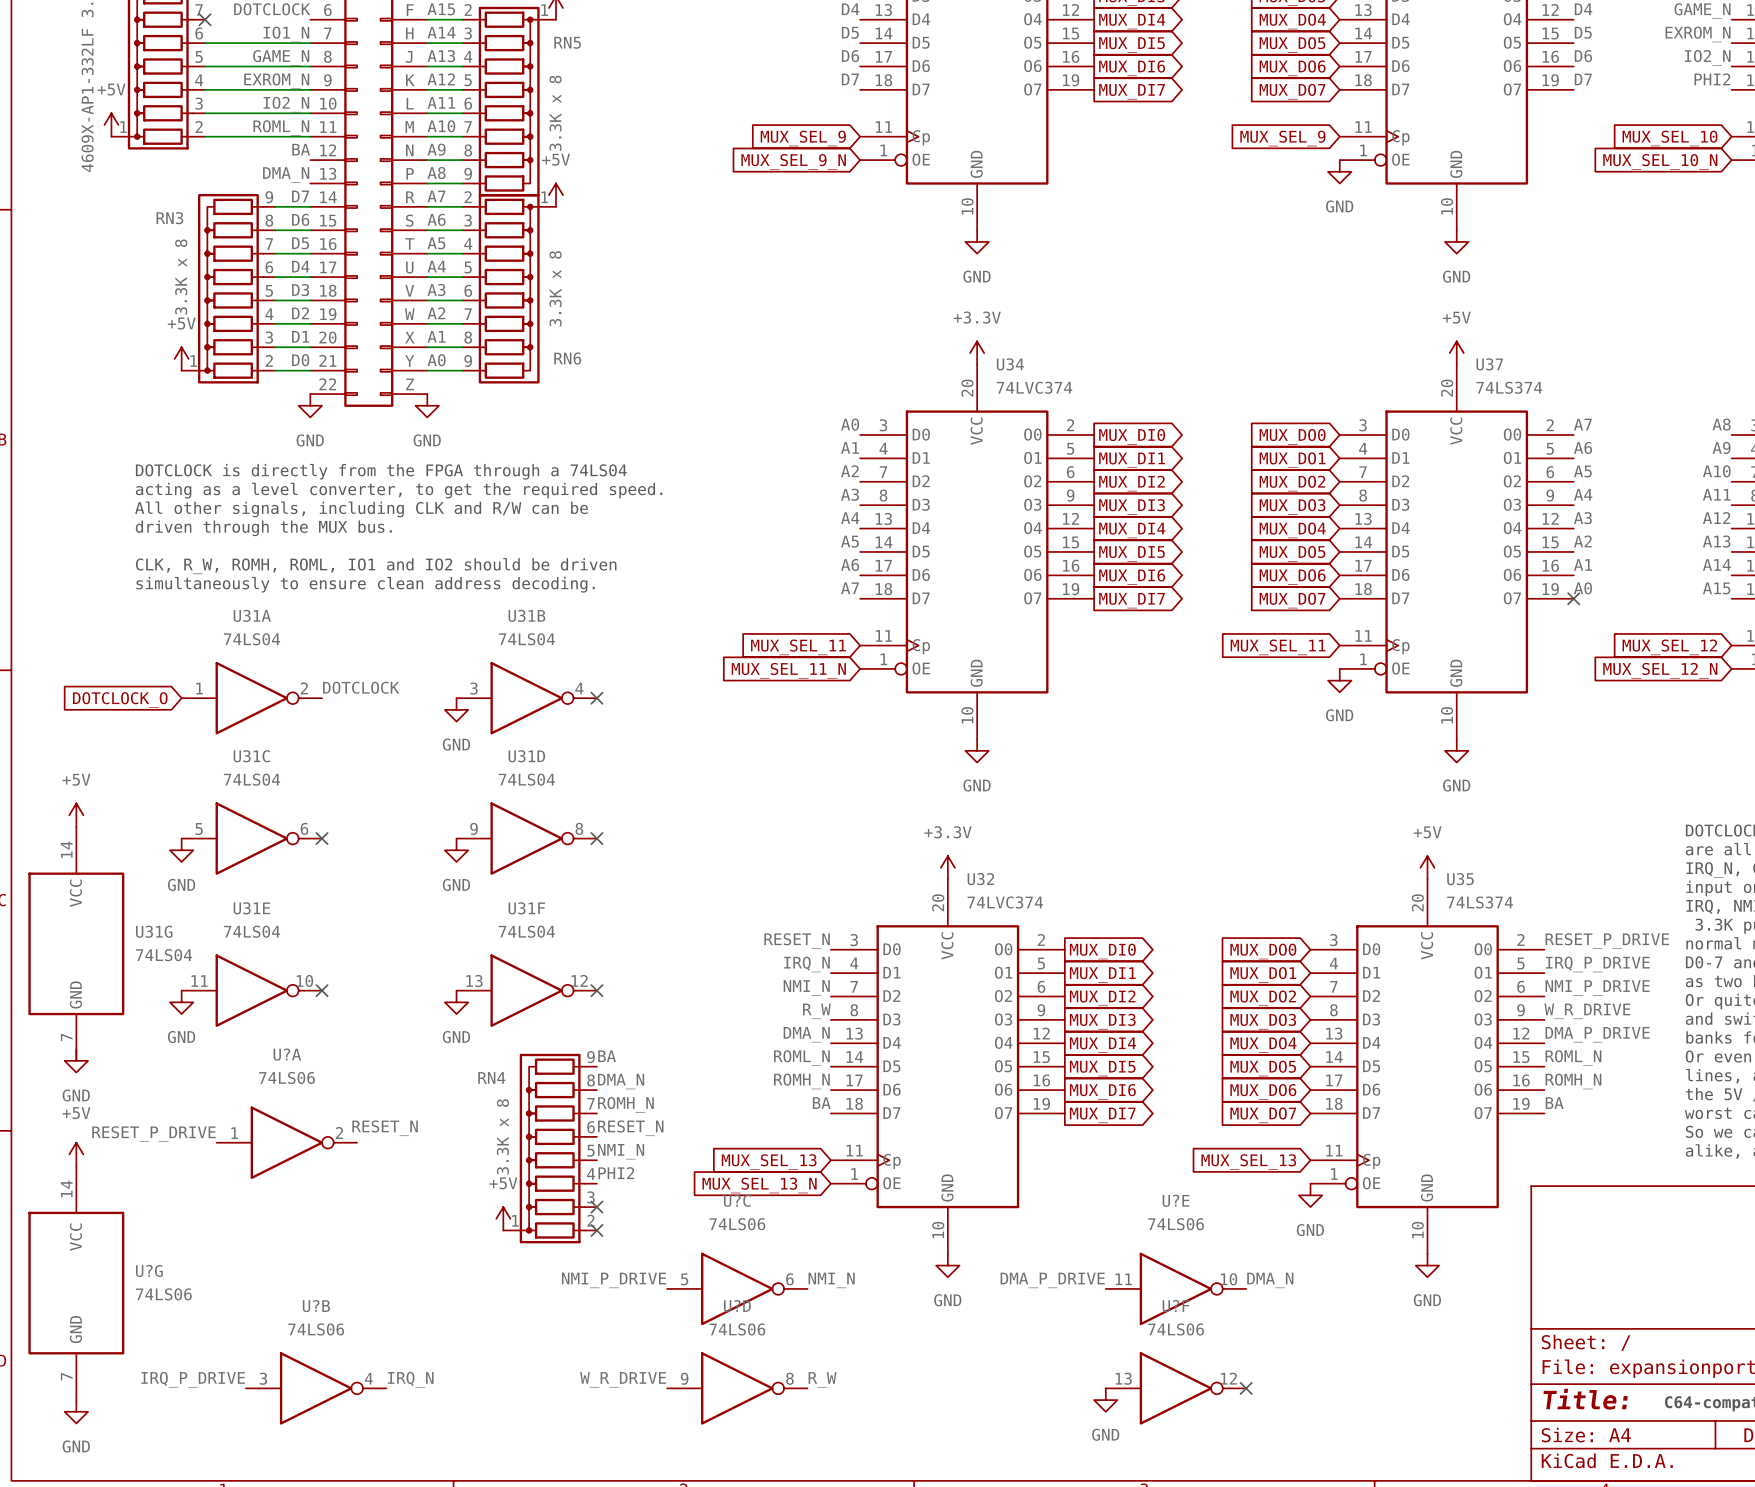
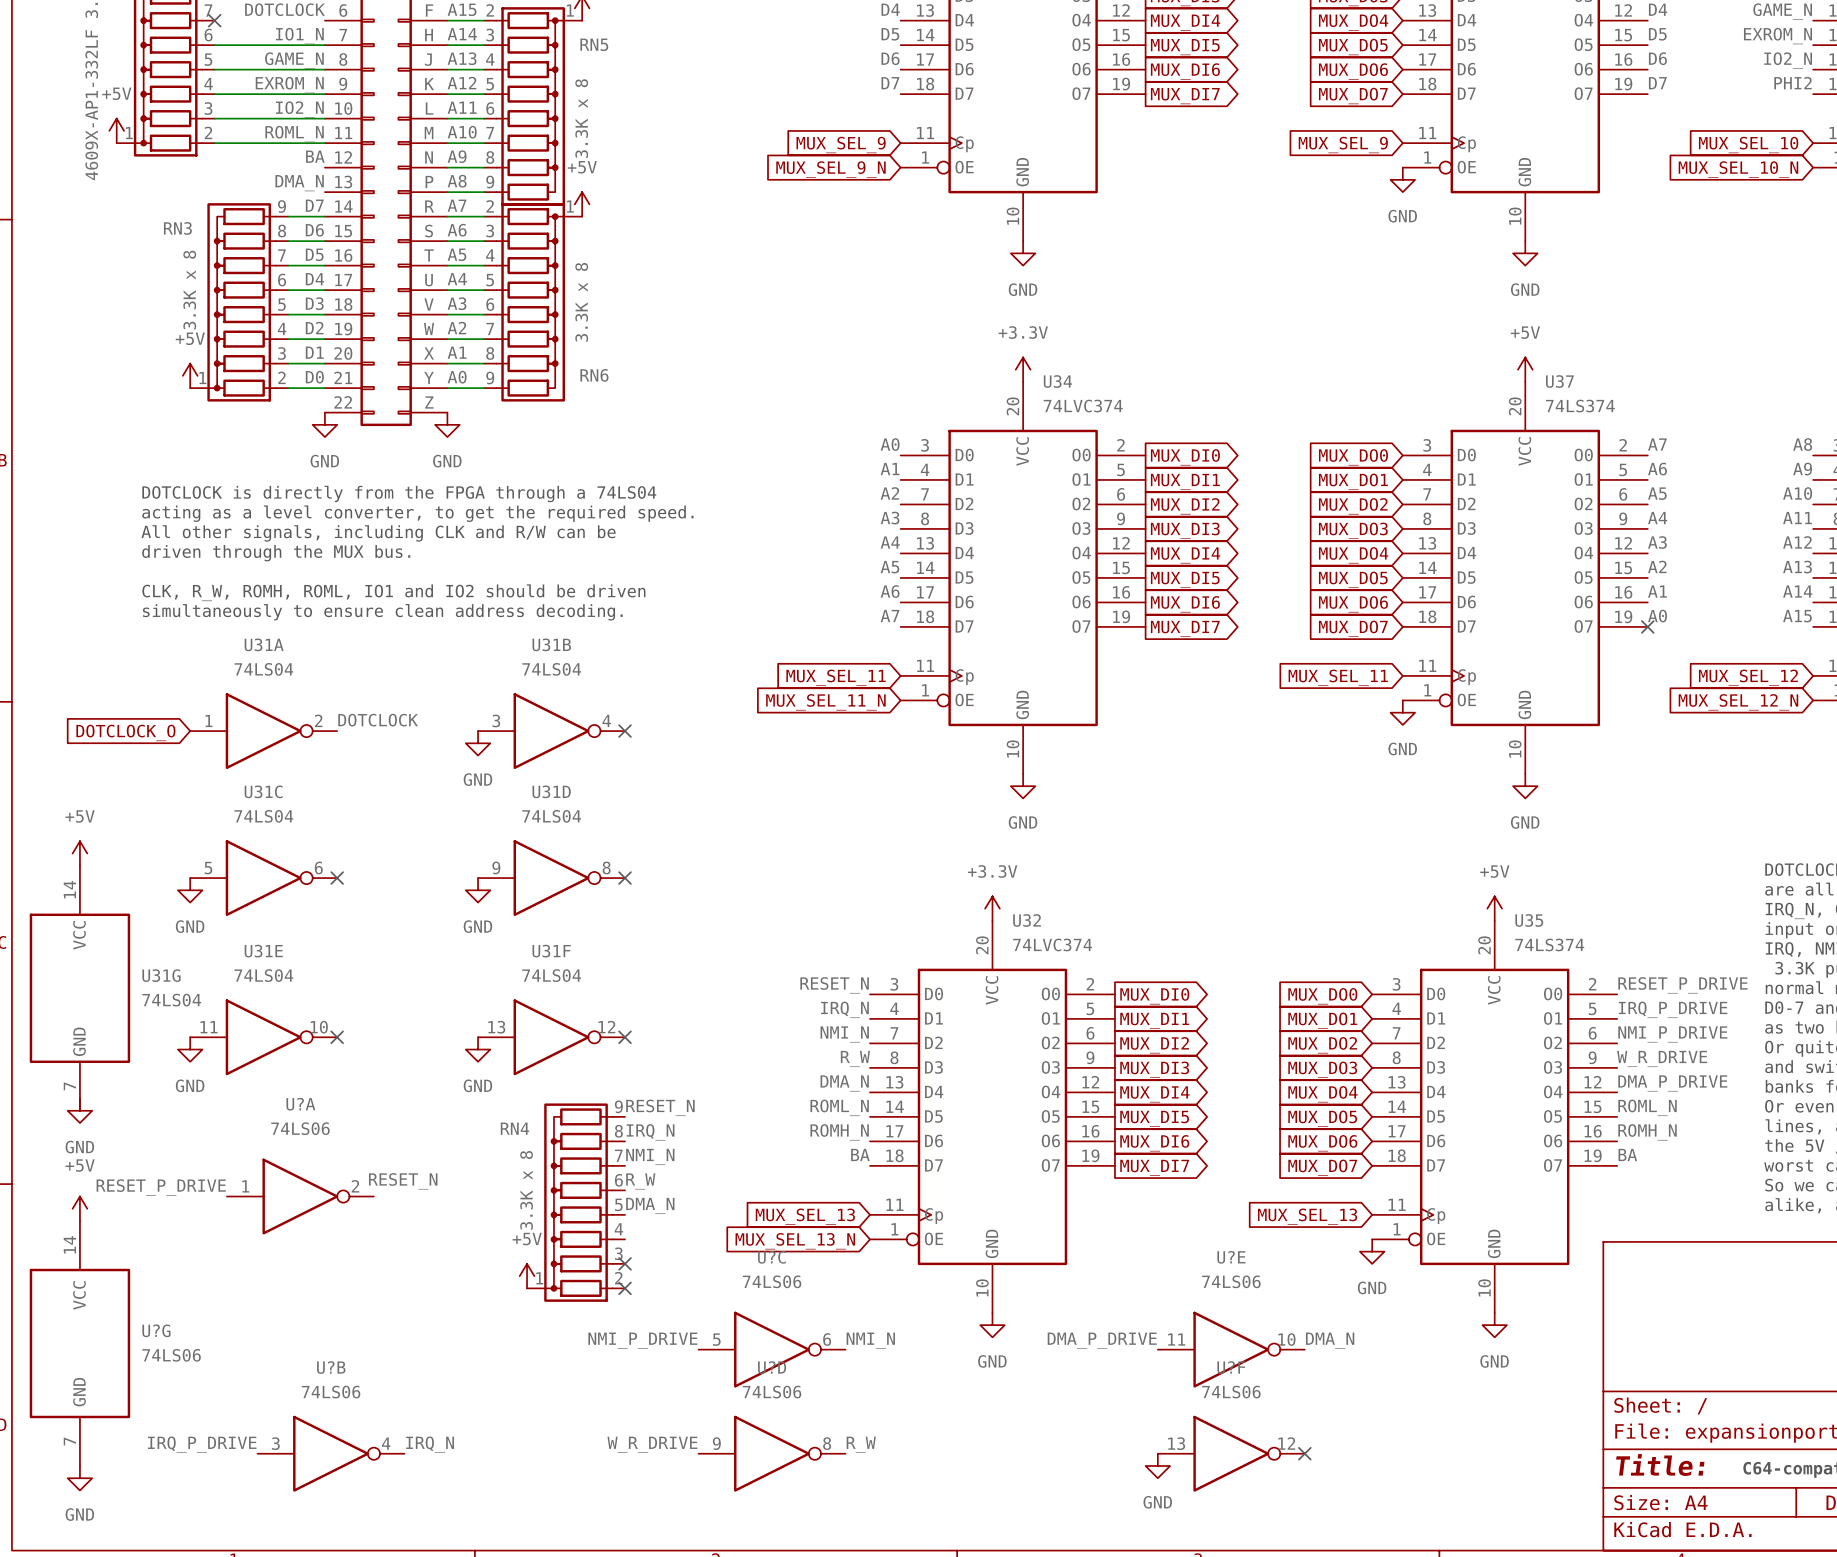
label: BA (607, 1056) -> RESET_N (660, 1107)
label: DMA_N (621, 1081) -> IRQ_N (650, 1132)
label: ROMH_N (625, 1104) -> NMI_N (650, 1156)
label: RESET_N (630, 1128) -> R_W (640, 1181)
label: NMI_N (621, 1151) -> DMA_N (650, 1205)
label: PHI2 (616, 1173) -> none

